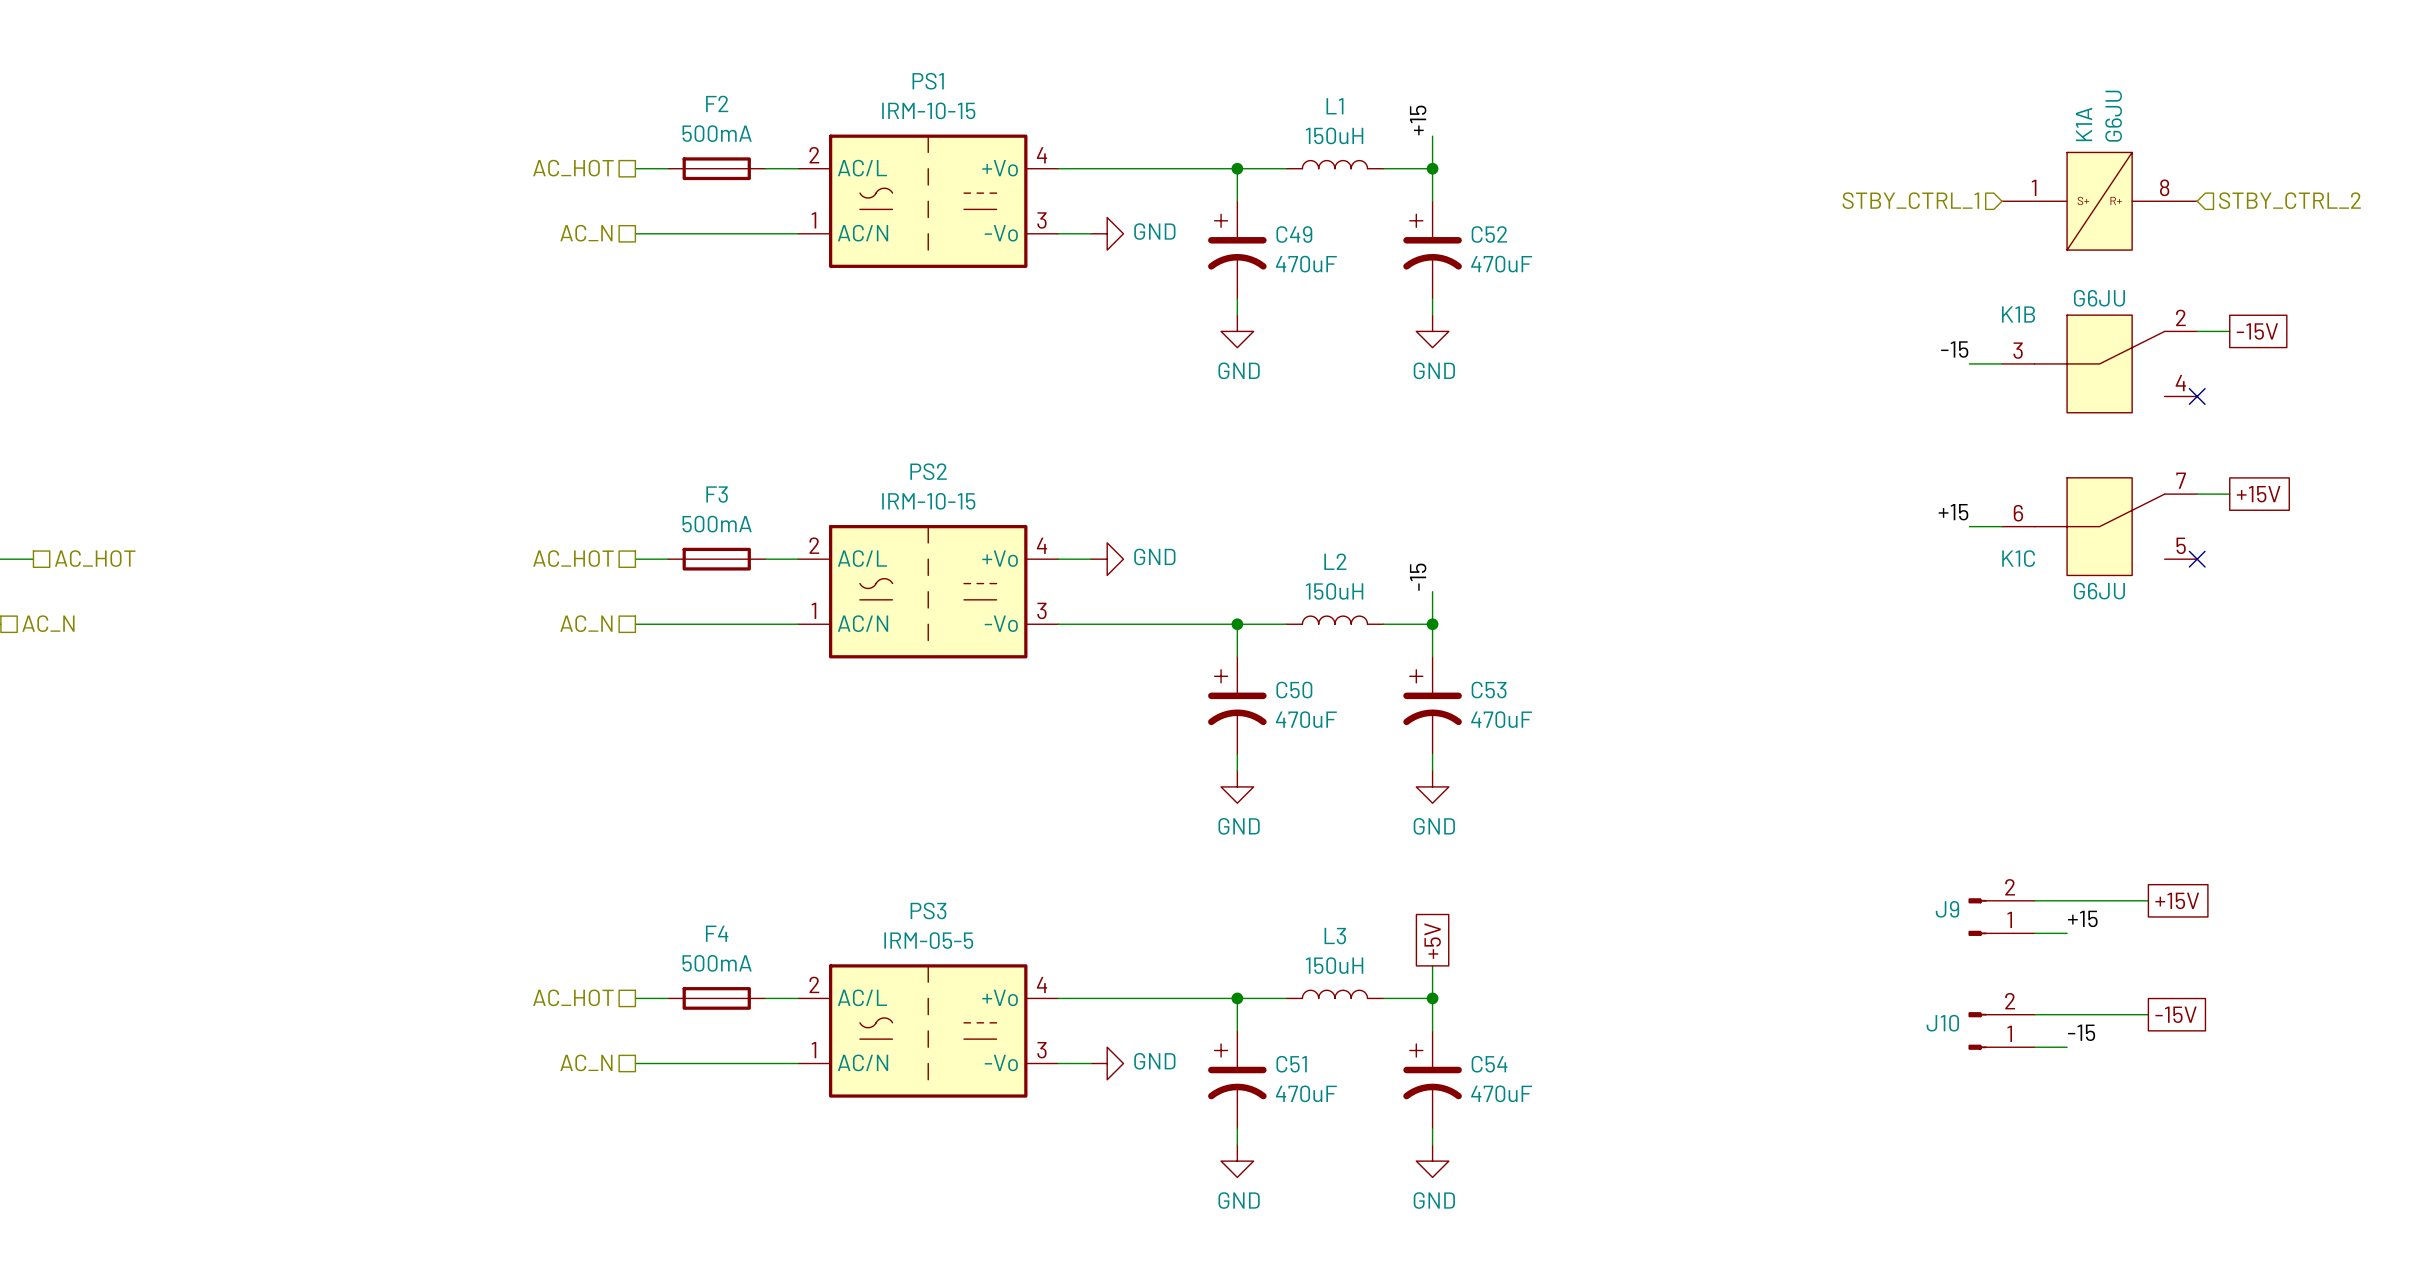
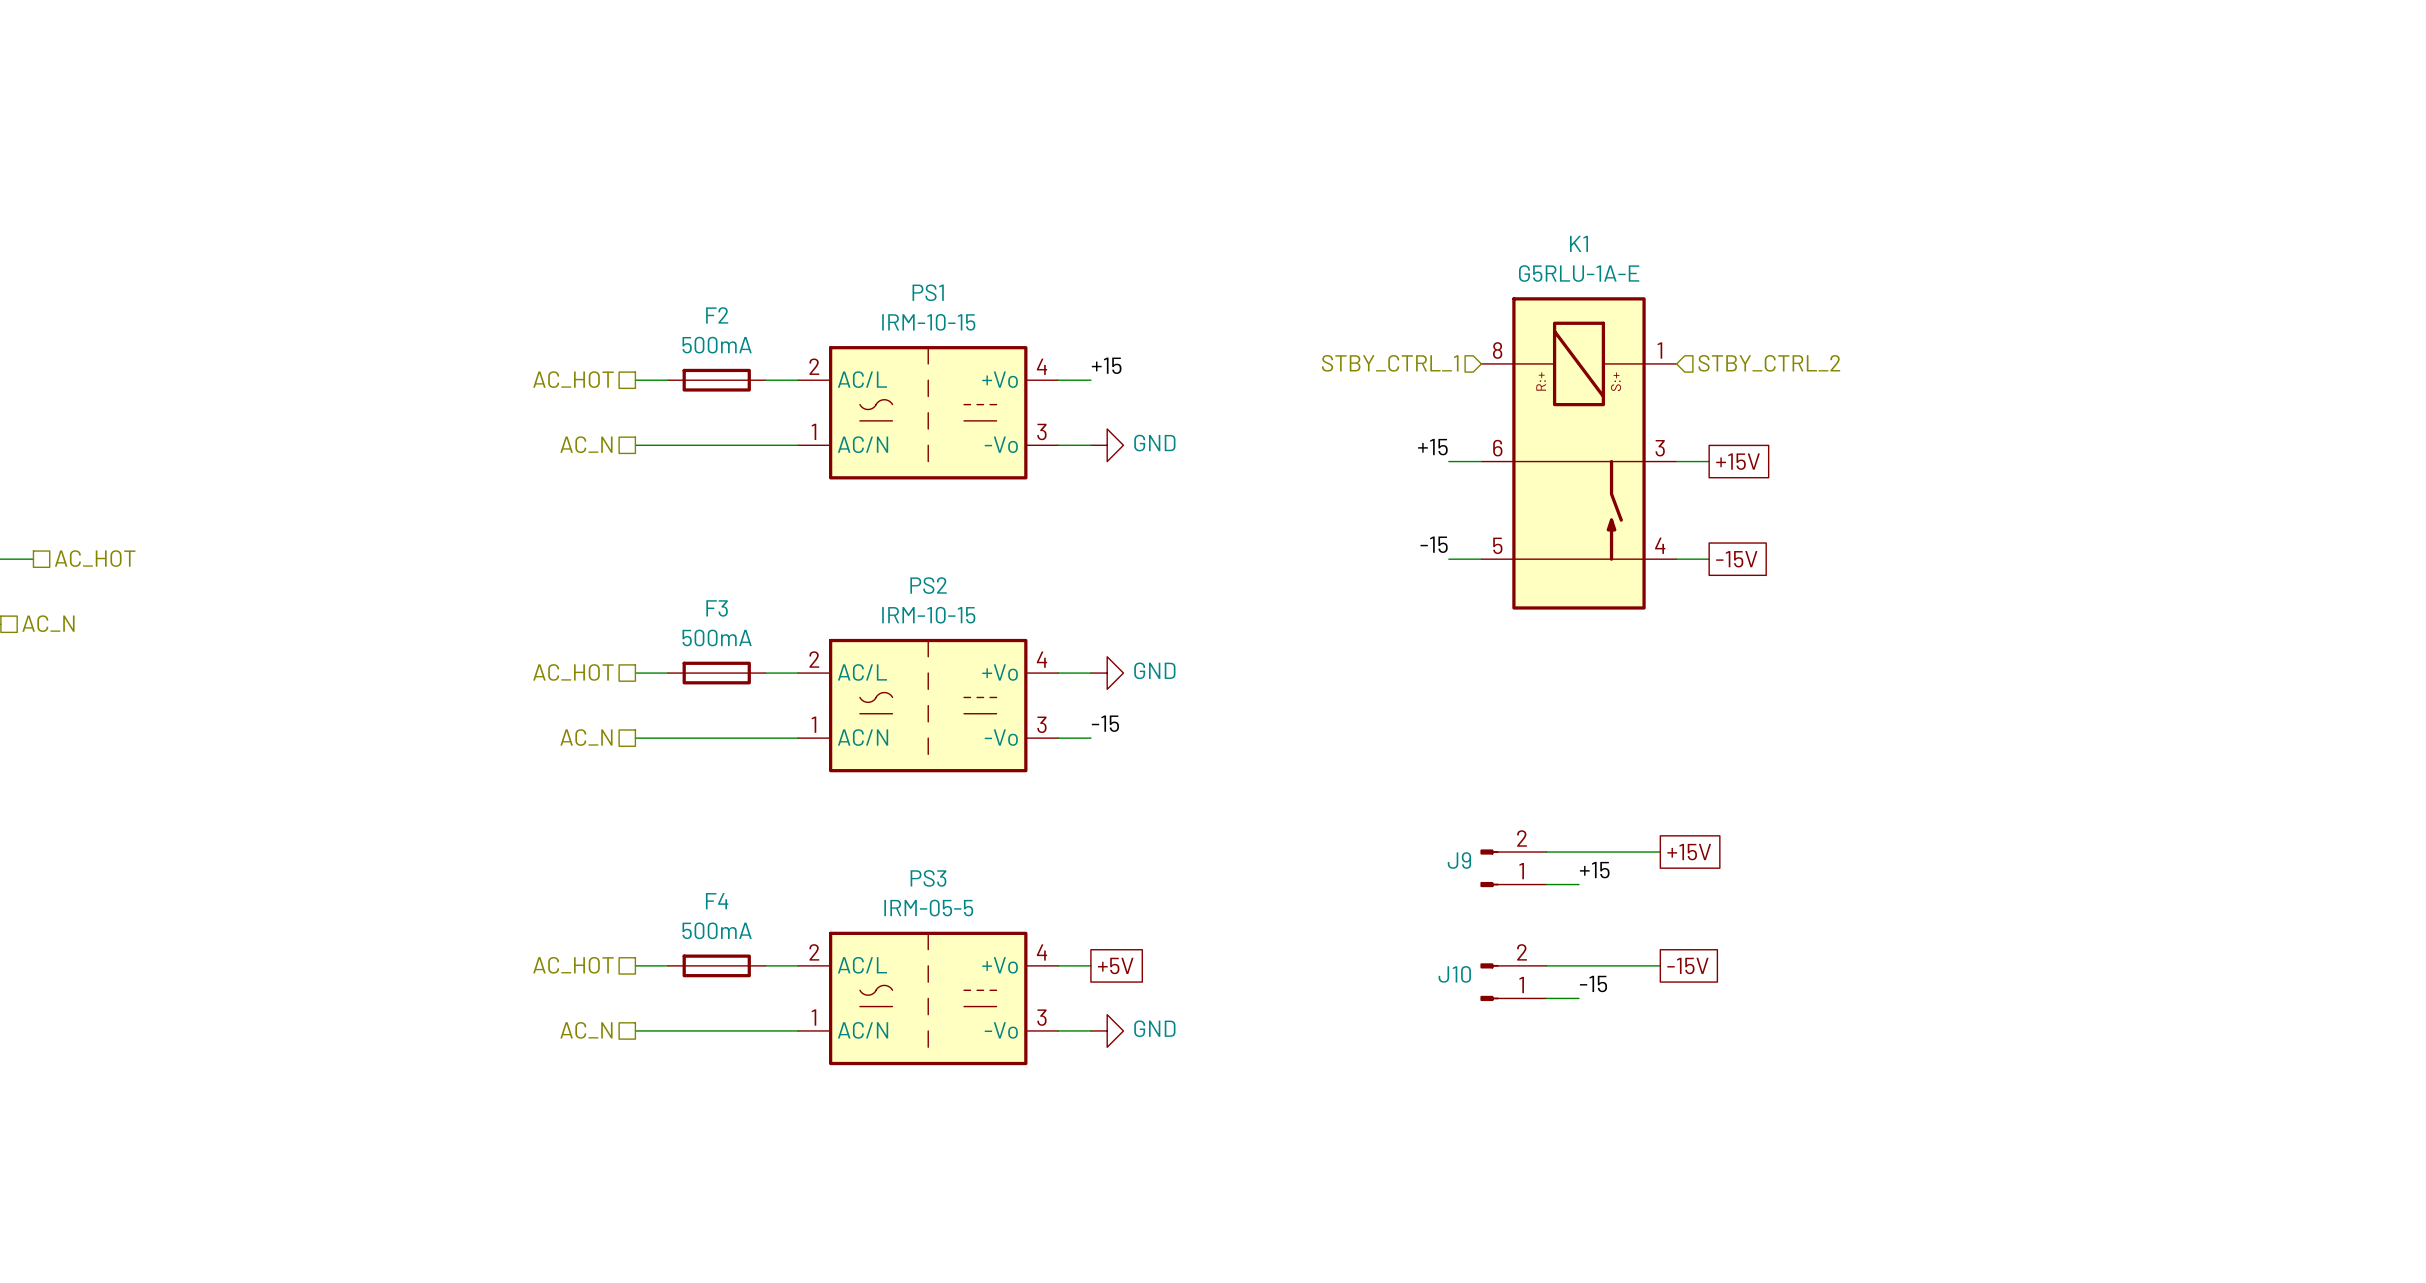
label: +15 (1418, 120) -> none
wire: (1432, 136) (1432, 201) -> none
L1: 150uH (1334, 164) -> none
hierarchical label: AC_HOT (573, 168) -> none
wire: (635, 168) (667, 168) -> (635, 380) (667, 380)
F2 position: (716, 168) -> (716, 380)
wire: (765, 168) (798, 168) -> (765, 380) (798, 380)
wire: (1058, 168) (1286, 168) -> none
wire: (1237, 168) (1237, 201) -> none
junction: (1237, 168) -> none
wire: (1383, 168) (1432, 168) -> none
junction: (1432, 168) -> none
hierarchical label: STBY_CTRL_1 (1910, 200) -> none
hierarchical label: STBY_CTRL_2 (2289, 200) -> none
PS1 position: (928, 201) -> (928, 412)
K1A: G6JU (2099, 201) -> none
hierarchical label: AC_N (586, 233) -> none
wire: (635, 233) (798, 233) -> (635, 445) (798, 445)
wire: (1058, 233) (1090, 233) -> (1058, 445) (1090, 445)
power symbol: GND (1107, 233) -> none
C49: 470uF (1237, 250) -> none
C52: 470uF (1432, 250) -> none
wire: (1237, 298) (1237, 315) -> none
wire: (1432, 298) (1432, 315) -> none
power symbol: GND (1237, 331) -> none
power symbol: GND (1432, 331) -> none
wire: (2197, 331) (2229, 331) -> none
global label: -15V (2257, 331) -> none
label: -15 (1954, 349) -> none
hierarchical label: none -> STBY_CTRL_1 (1390, 363)
hierarchical label: none -> STBY_CTRL_2 (1769, 363)
wire: (1969, 363) (2001, 363) -> (1676, 461) (1709, 461)
K1B: G6JU (2099, 363) -> none
label: none -> +15 (1106, 365)
hierarchical label: none -> AC_HOT (573, 379)
wire: none -> (1058, 380) (1090, 380)
no-connect mark: (2197, 396) -> none
hierarchical label: none -> AC_N (586, 444)
power symbol: none -> GND (1107, 445)
label: none -> +15 (1432, 447)
K1: none -> G5RLU-1A-E (1578, 453)
wire: none -> (1448, 461) (1481, 461)
global label: none -> +15V (1738, 461)
wire: (2197, 494) (2229, 494) -> none
global label: +15V (2258, 494) -> none
label: +15 (1953, 512) -> none
wire: (1969, 526) (2001, 526) -> (1676, 559) (1709, 559)
K1C: G6JU (2099, 526) -> none
hierarchical label: AC_HOT (573, 558) -> none
wire: (635, 559) (667, 559) -> (635, 673) (667, 673)
F3 position: (716, 559) -> (716, 673)
wire: (765, 559) (798, 559) -> (765, 673) (798, 673)
wire: (1058, 559) (1090, 559) -> (1058, 673) (1090, 673)
power symbol: GND (1107, 559) -> none
wire: none -> (1448, 559) (1481, 559)
global label: none -> -15V (1736, 559)
no-connect mark: (2197, 559) -> none
label rotation: 0° (1418, 577) -> 90° clockwise (1434, 544)
PS2 position: (928, 591) -> (928, 705)
wire: (1432, 591) (1432, 656) -> none
L2: 150uH (1334, 620) -> none
hierarchical label: AC_N (586, 623) -> none
wire: (635, 624) (798, 624) -> (635, 738) (798, 738)
wire: (1058, 624) (1286, 624) -> none
wire: (1237, 624) (1237, 656) -> none
junction: (1237, 624) -> none
wire: (1383, 624) (1432, 624) -> none
junction: (1432, 624) -> none
hierarchical label: none -> AC_HOT (573, 672)
power symbol: none -> GND (1107, 673)
C50: 470uF (1237, 705) -> none
C53: 470uF (1432, 705) -> none
label: none -> -15 (1105, 723)
hierarchical label: none -> AC_N (586, 737)
wire: none -> (1058, 738) (1090, 738)
wire: (1237, 754) (1237, 770) -> none
wire: (1432, 754) (1432, 770) -> none
power symbol: GND (1237, 786) -> none
power symbol: GND (1432, 786) -> none
wire: none -> (1546, 852) (1660, 852)
global label: none -> +15V (1689, 852)
label: none -> +15 (1594, 870)
wire: none -> (1546, 884) (1578, 884)
wire: (2034, 900) (2148, 900) -> none
global label: +15V (2177, 900) -> none
J9 position: (2001, 917) -> (1513, 868)
label: +15 (2082, 918) -> none
wire: (2034, 933) (2067, 933) -> none
global label: +5V (1432, 941) -> none
wire: none -> (1058, 965) (1090, 965)
global label: none -> +5V (1115, 965)
wire: (1432, 965) (1432, 1030) -> none
wire: none -> (1546, 965) (1660, 965)
global label: none -> -15V (1687, 965)
label: none -> -15 (1593, 983)
L3: 150uH (1334, 994) -> none
hierarchical label position: AC_HOT (573, 997) -> AC_HOT (573, 965)
wire: (635, 998) (667, 998) -> (635, 965) (667, 965)
F4 position: (716, 998) -> (716, 965)
wire: (765, 998) (798, 998) -> (765, 965) (798, 965)
wire: (1058, 998) (1286, 998) -> none
wire: (1237, 998) (1237, 1030) -> none
junction: (1237, 998) -> none
wire: (1383, 998) (1432, 998) -> none
junction: (1432, 998) -> none
wire: none -> (1546, 998) (1578, 998)
wire: (2034, 1014) (2148, 1014) -> none
global label: -15V (2176, 1014) -> none
PS3 position: (928, 1030) -> (928, 998)
J10 position: (2001, 1030) -> (1513, 982)
label: -15 (2081, 1032) -> none
wire: (2034, 1047) (2067, 1047) -> none
hierarchical label position: AC_N (586, 1062) -> AC_N (586, 1030)
wire: (635, 1063) (798, 1063) -> (635, 1030) (798, 1030)
wire: (1058, 1063) (1090, 1063) -> (1058, 1030) (1090, 1030)
power symbol position: GND (1107, 1063) -> GND (1107, 1030)
C51: 470uF (1237, 1079) -> none
C54: 470uF (1432, 1079) -> none
wire: (1237, 1128) (1237, 1144) -> none
wire: (1432, 1128) (1432, 1144) -> none
power symbol: GND (1237, 1161) -> none
power symbol: GND (1432, 1161) -> none

